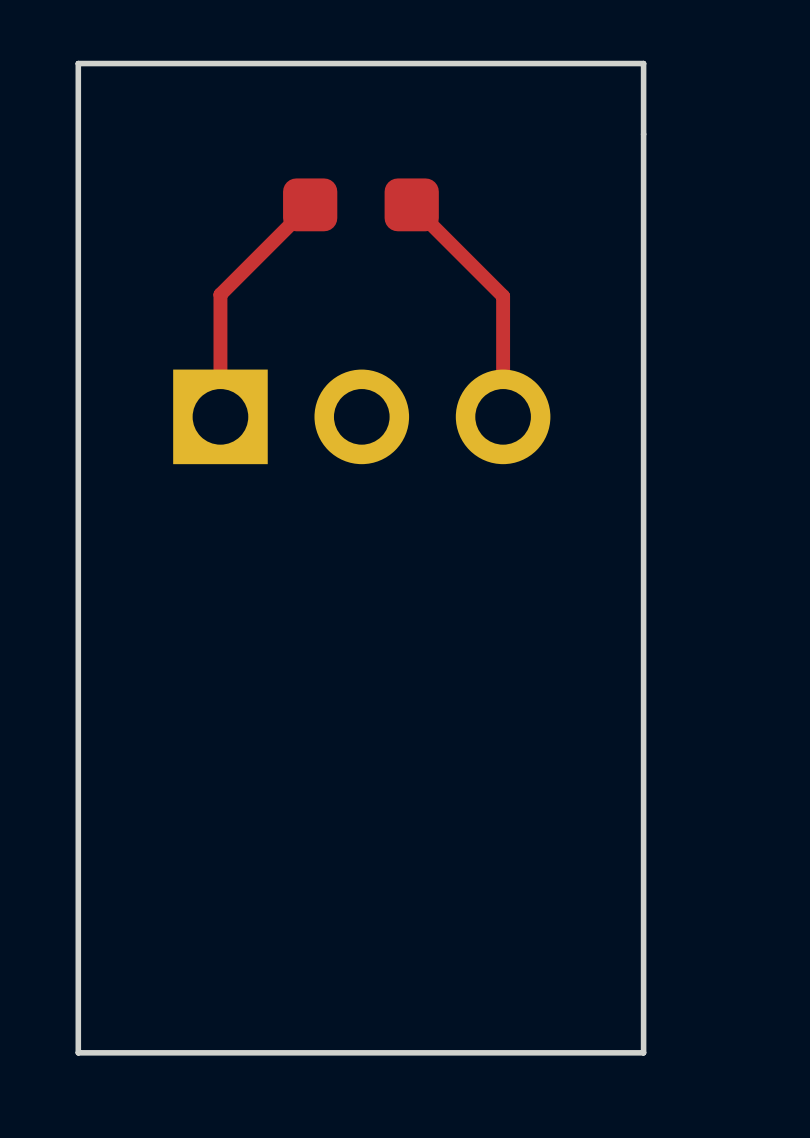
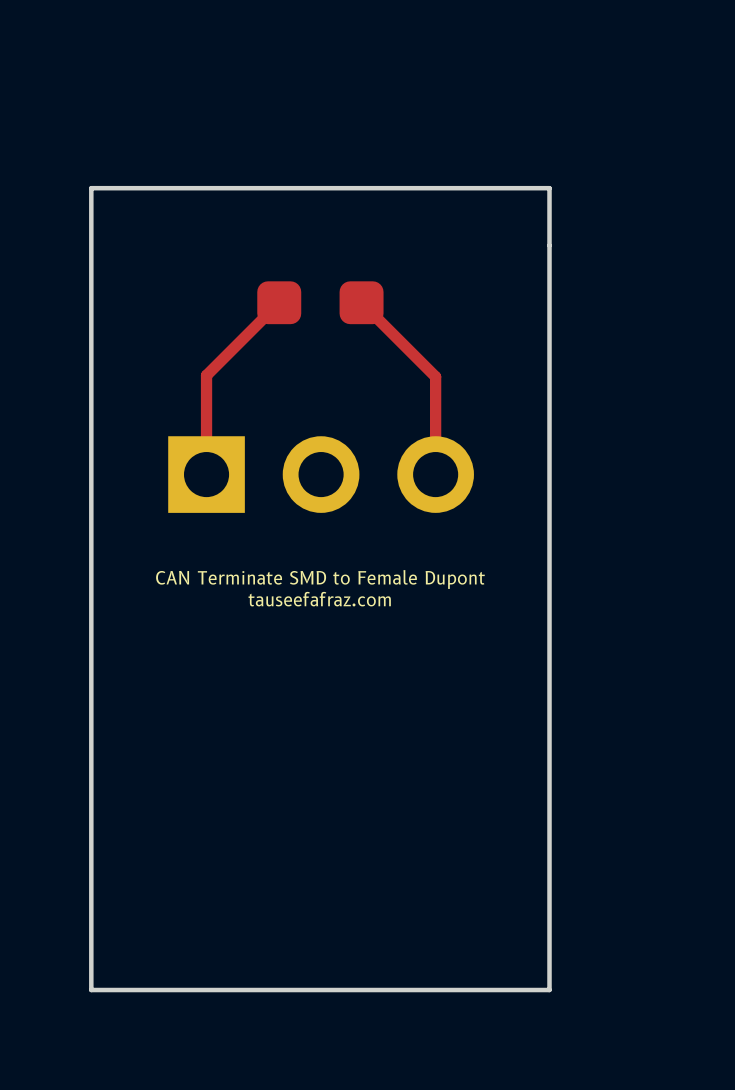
text: none -> CAN Terminate SMD to Female Dupont (320, 579)
text: none -> tauseefafraz.com (319, 599)

